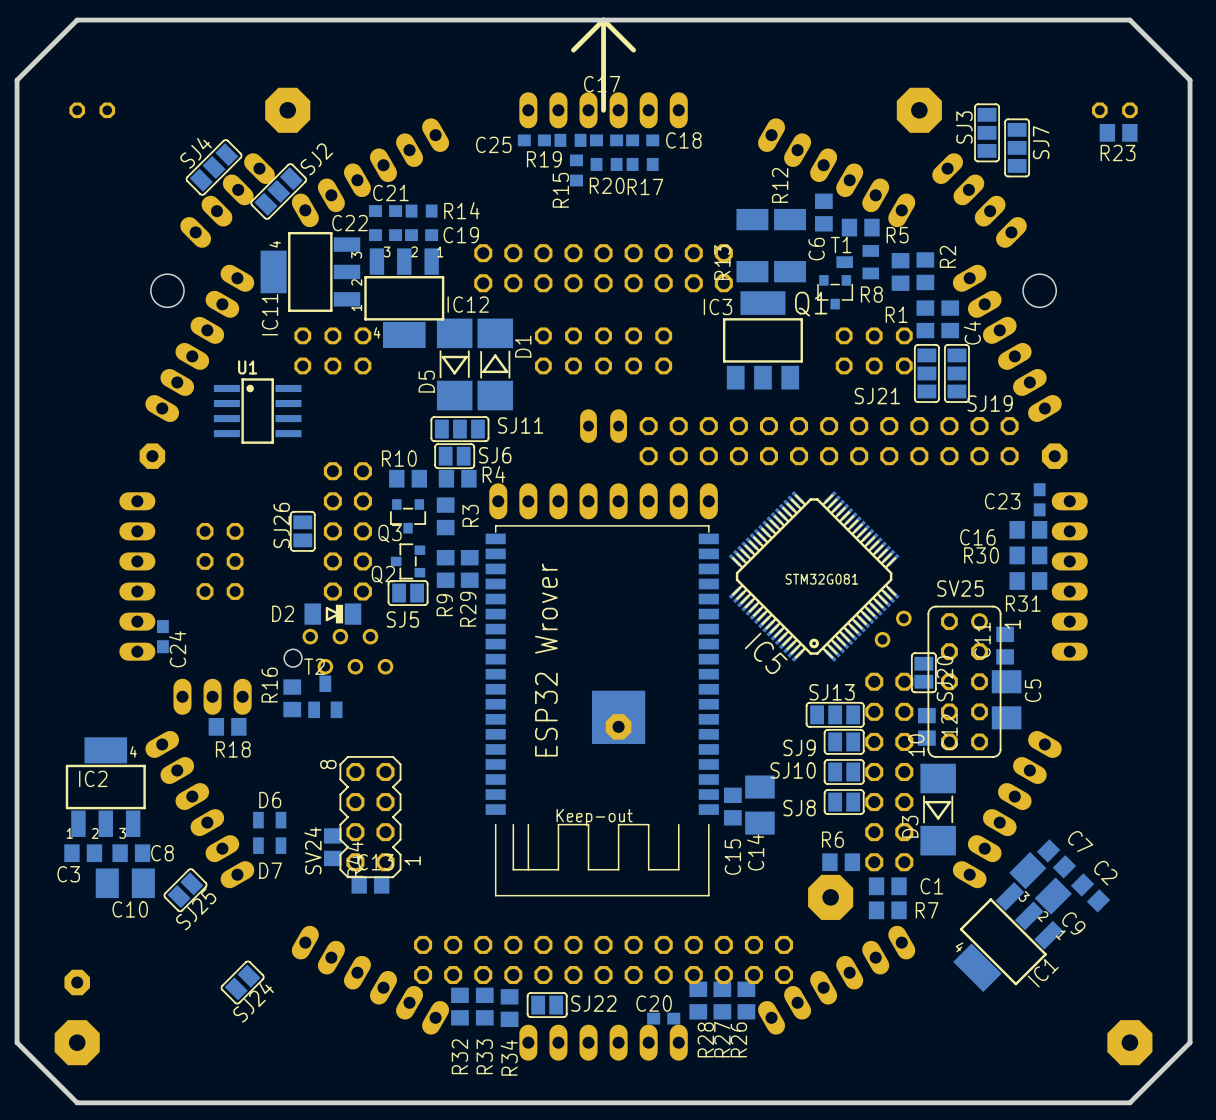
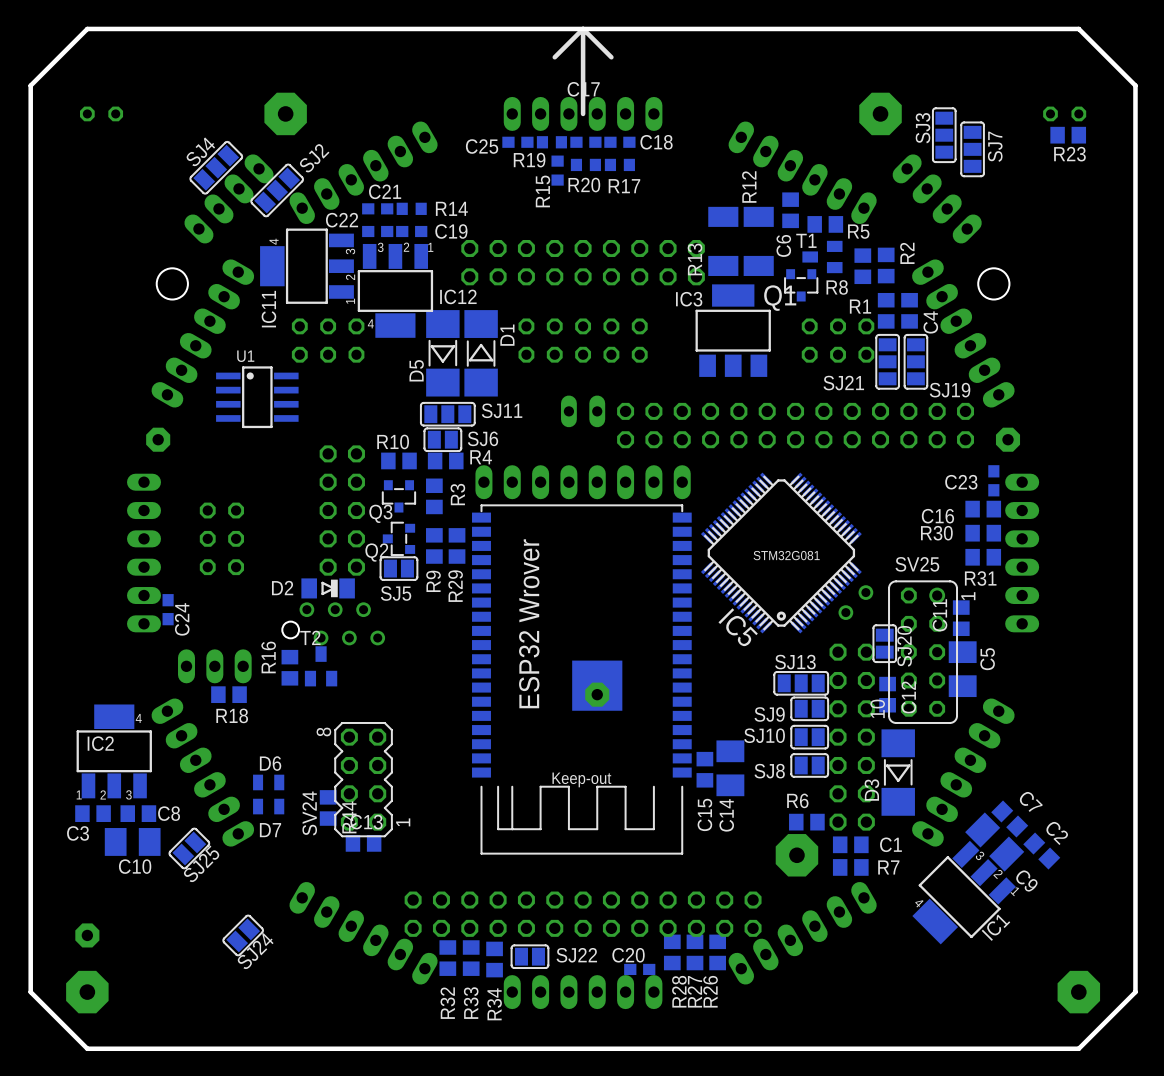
SJ26: (302, 531) -> none

